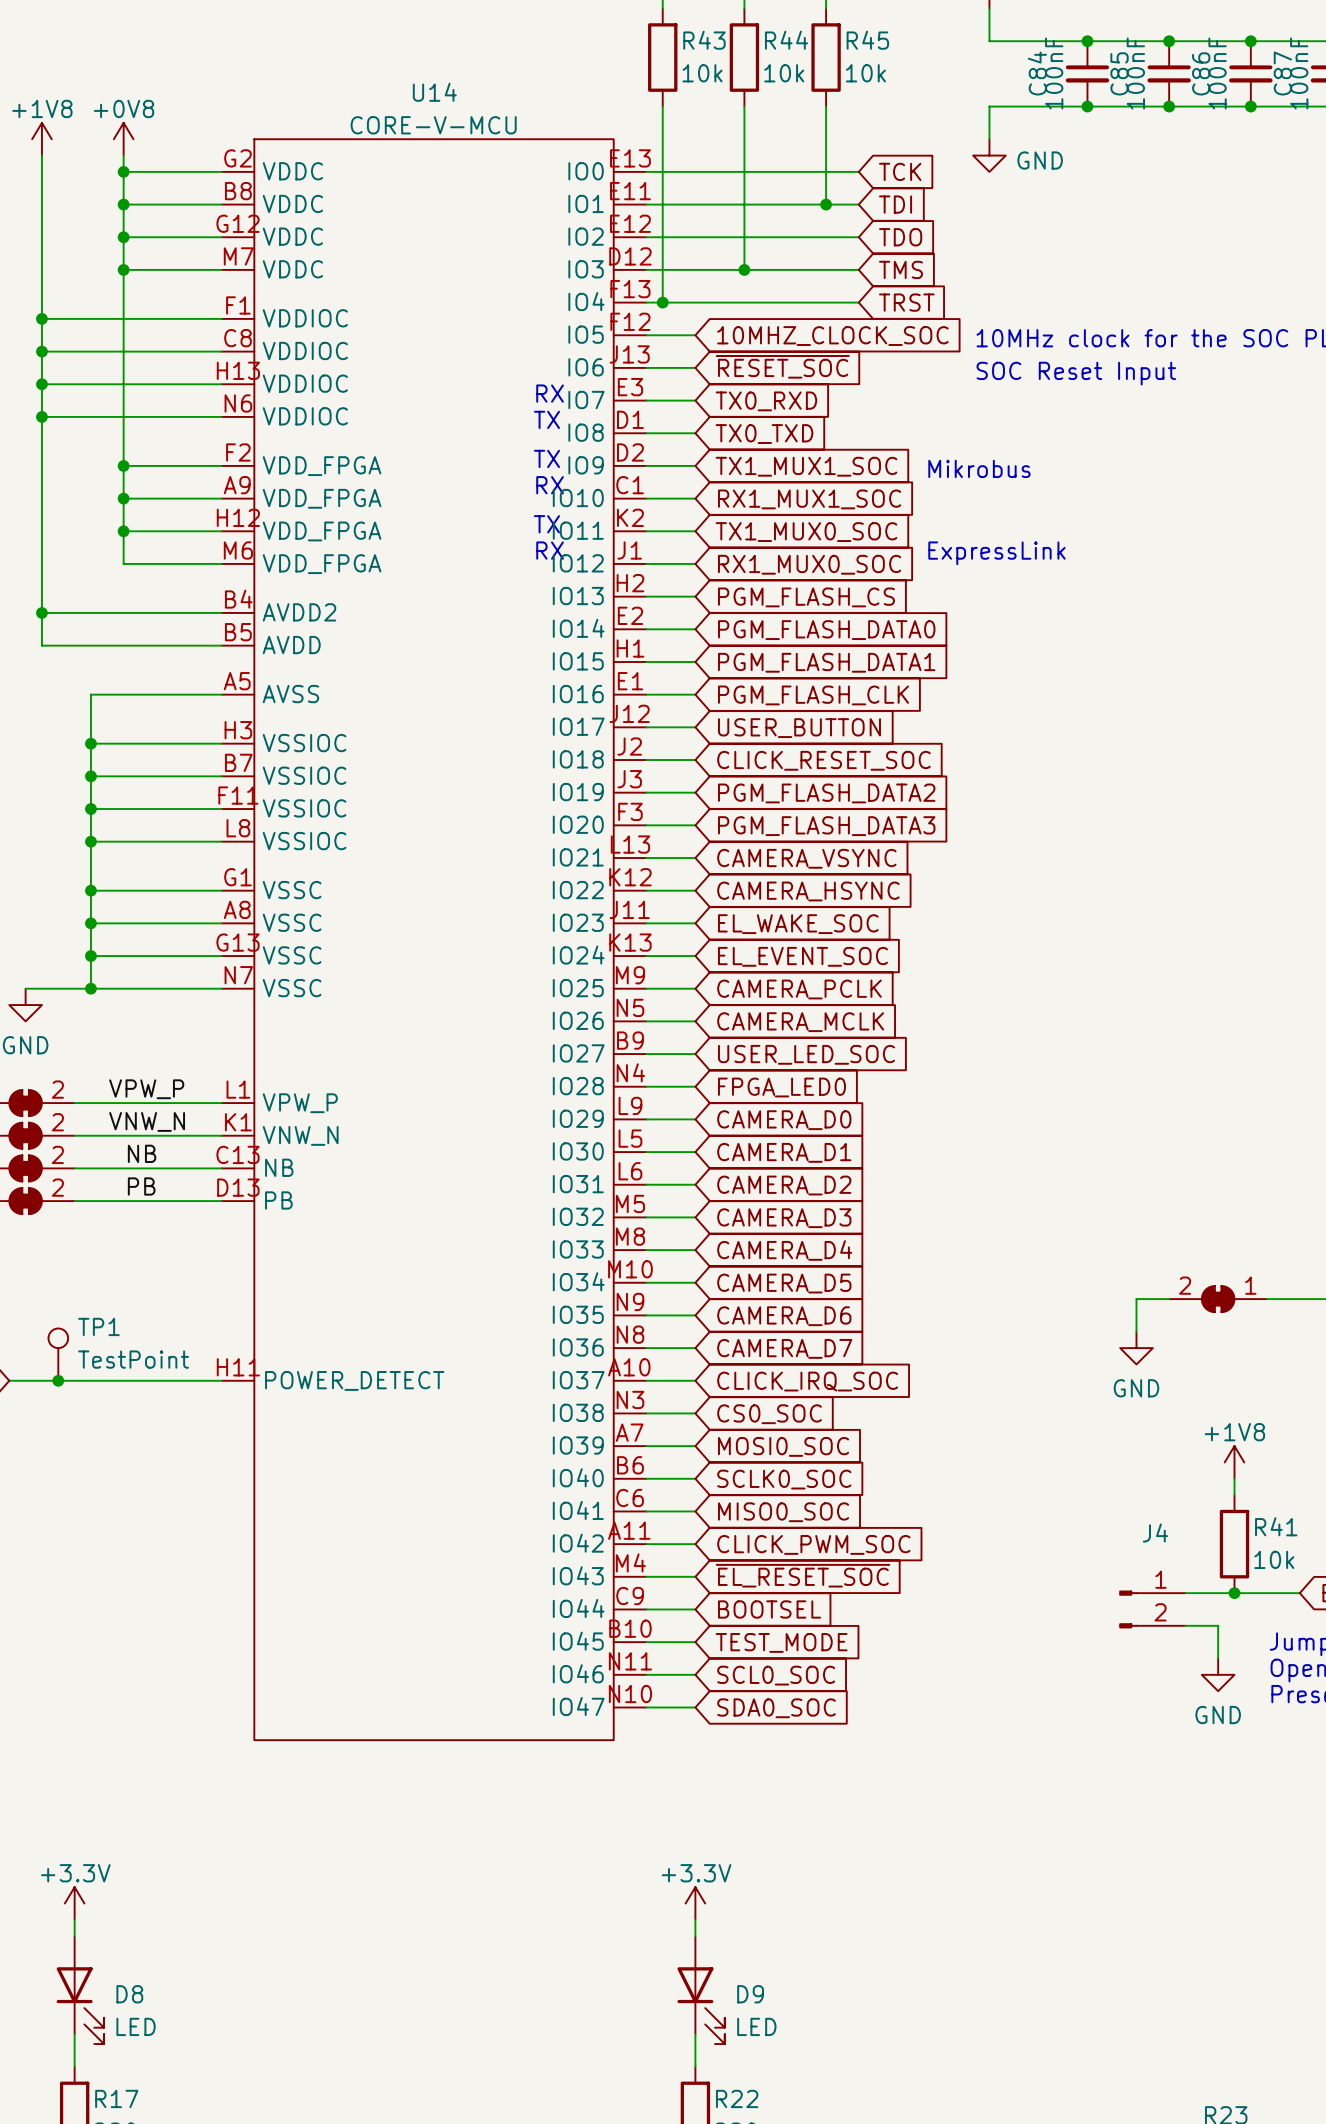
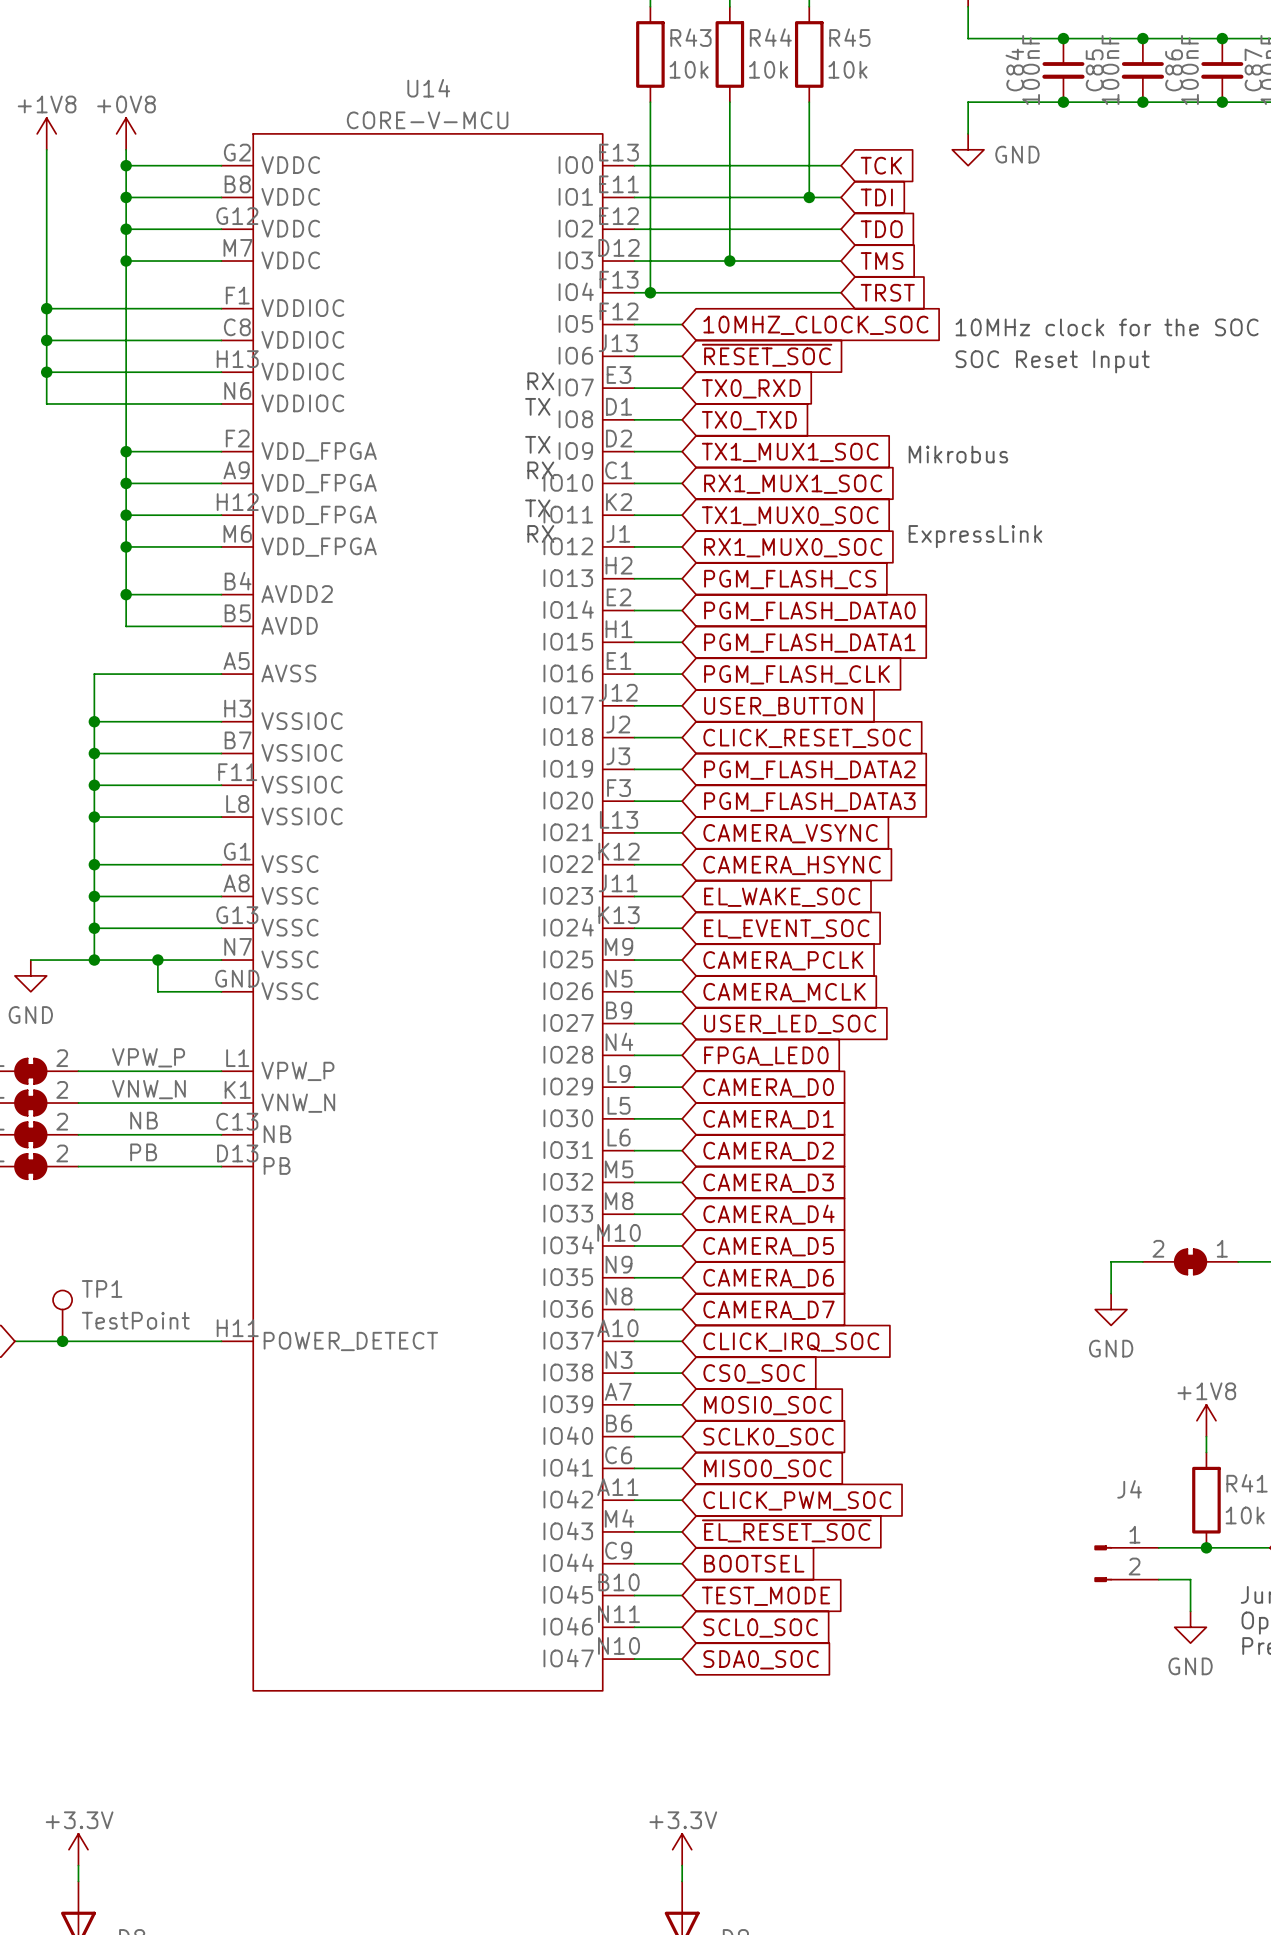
U14 symbol: [221, 139, 647, 1741] -> [221, 133, 635, 1691]
wire: (41, 416) (41, 645) (123, 645) -> (126, 546) (126, 626)
junction: (41, 416) -> none
junction: none -> (126, 546)
wire: (41, 612) (123, 612) -> none
junction: (41, 612) -> none
junction: none -> (126, 594)
wire: none -> (157, 960) (157, 991) (221, 991)
junction: none -> (157, 960)

